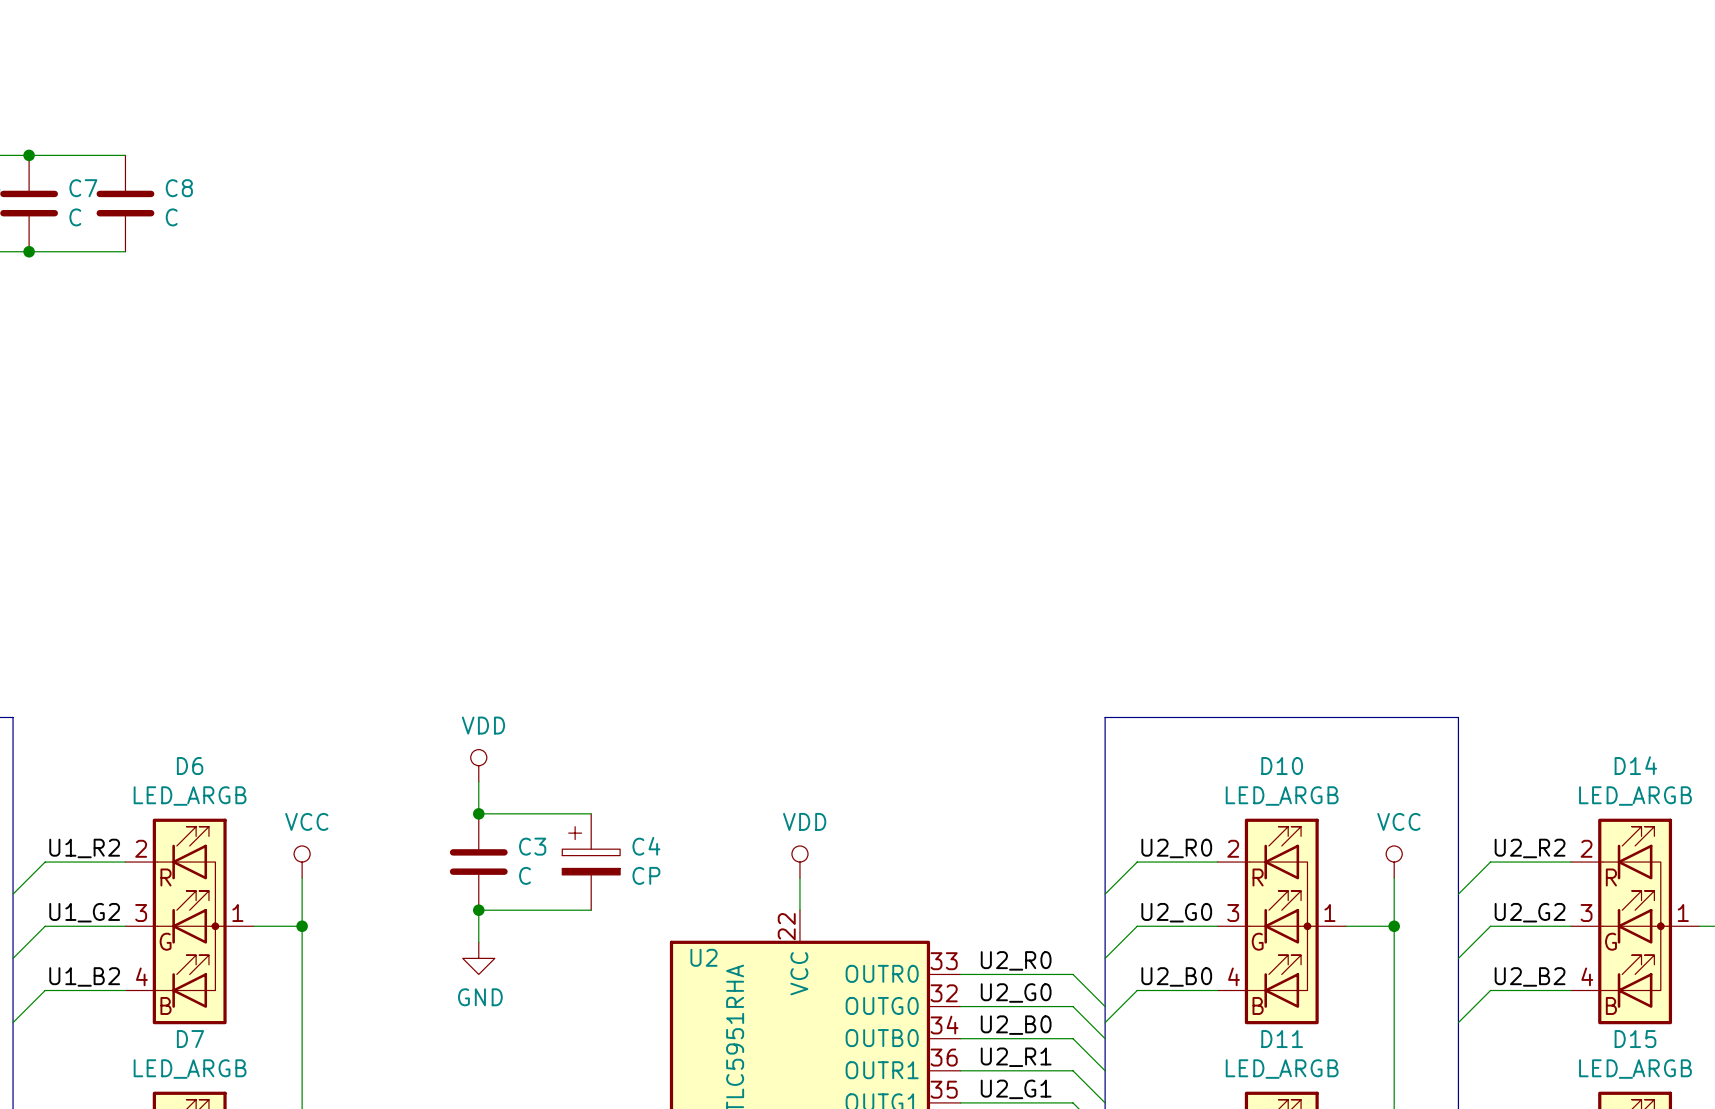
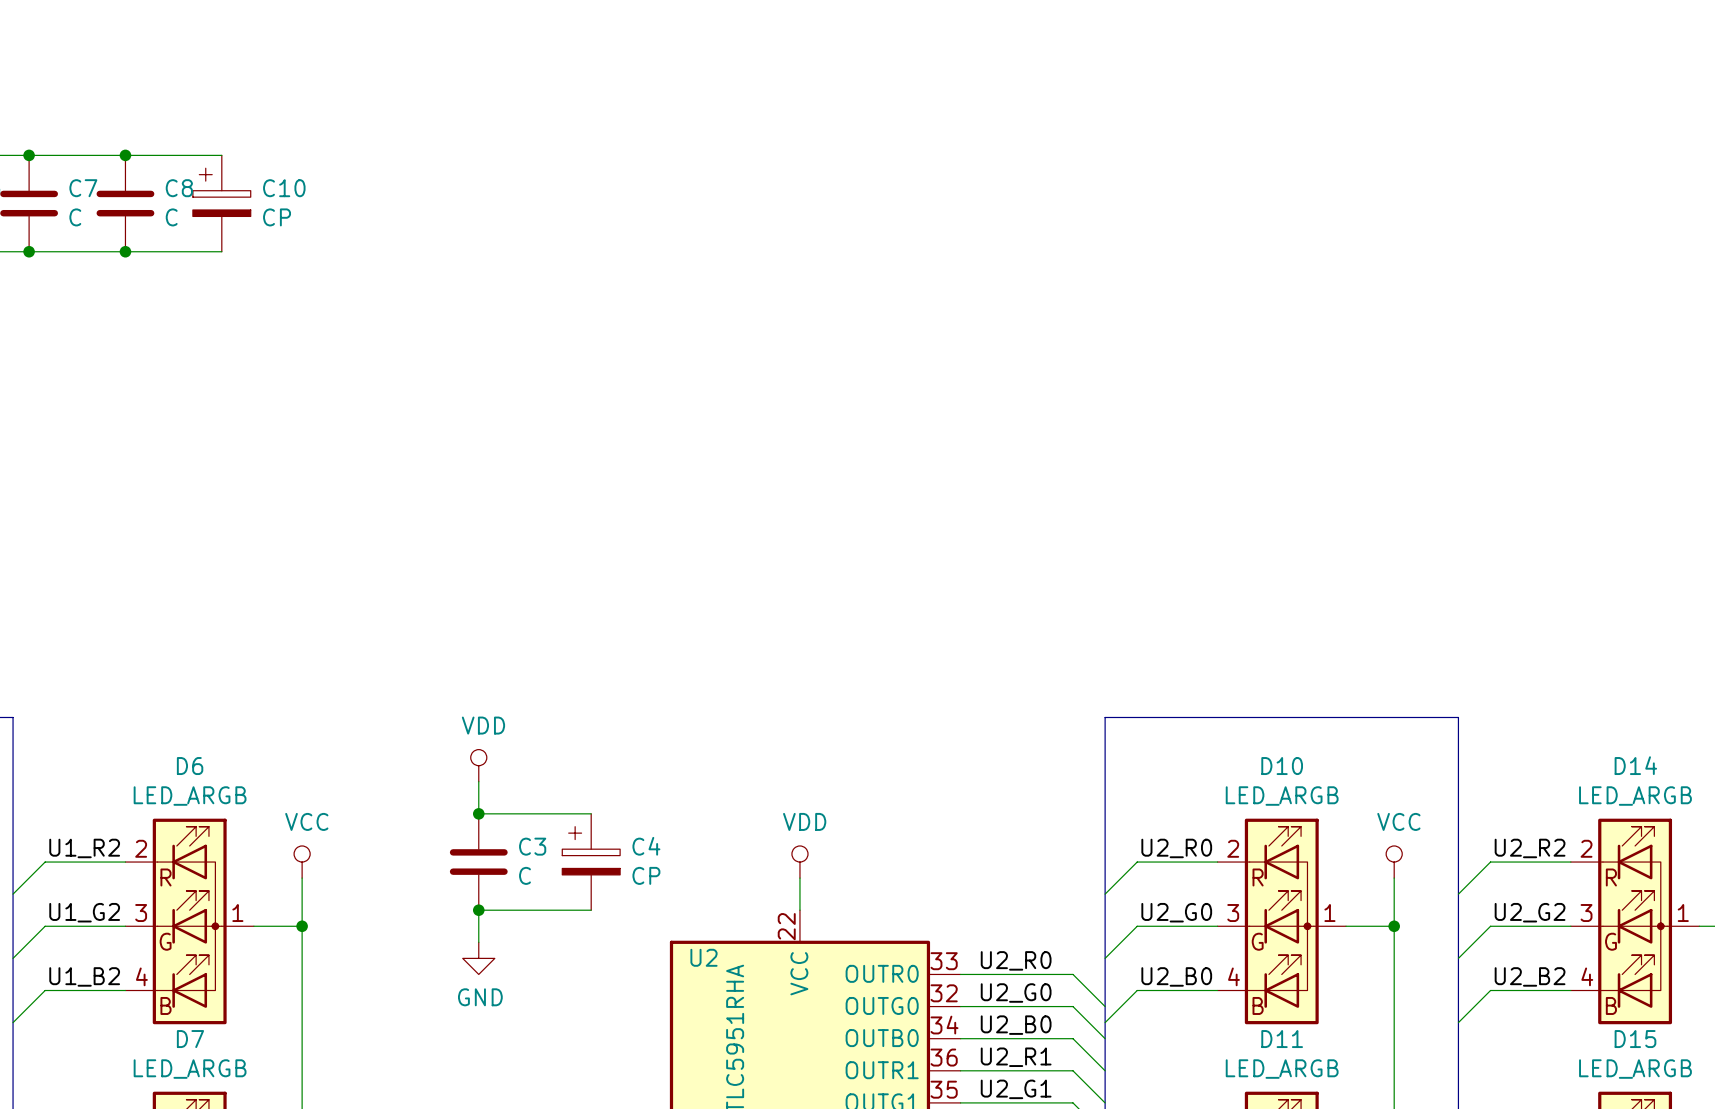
wire: none -> (125, 155) (221, 155)
junction: none -> (125, 155)
C10: none -> CP (221, 203)
wire: none -> (125, 251) (221, 251)
junction: none -> (125, 251)

